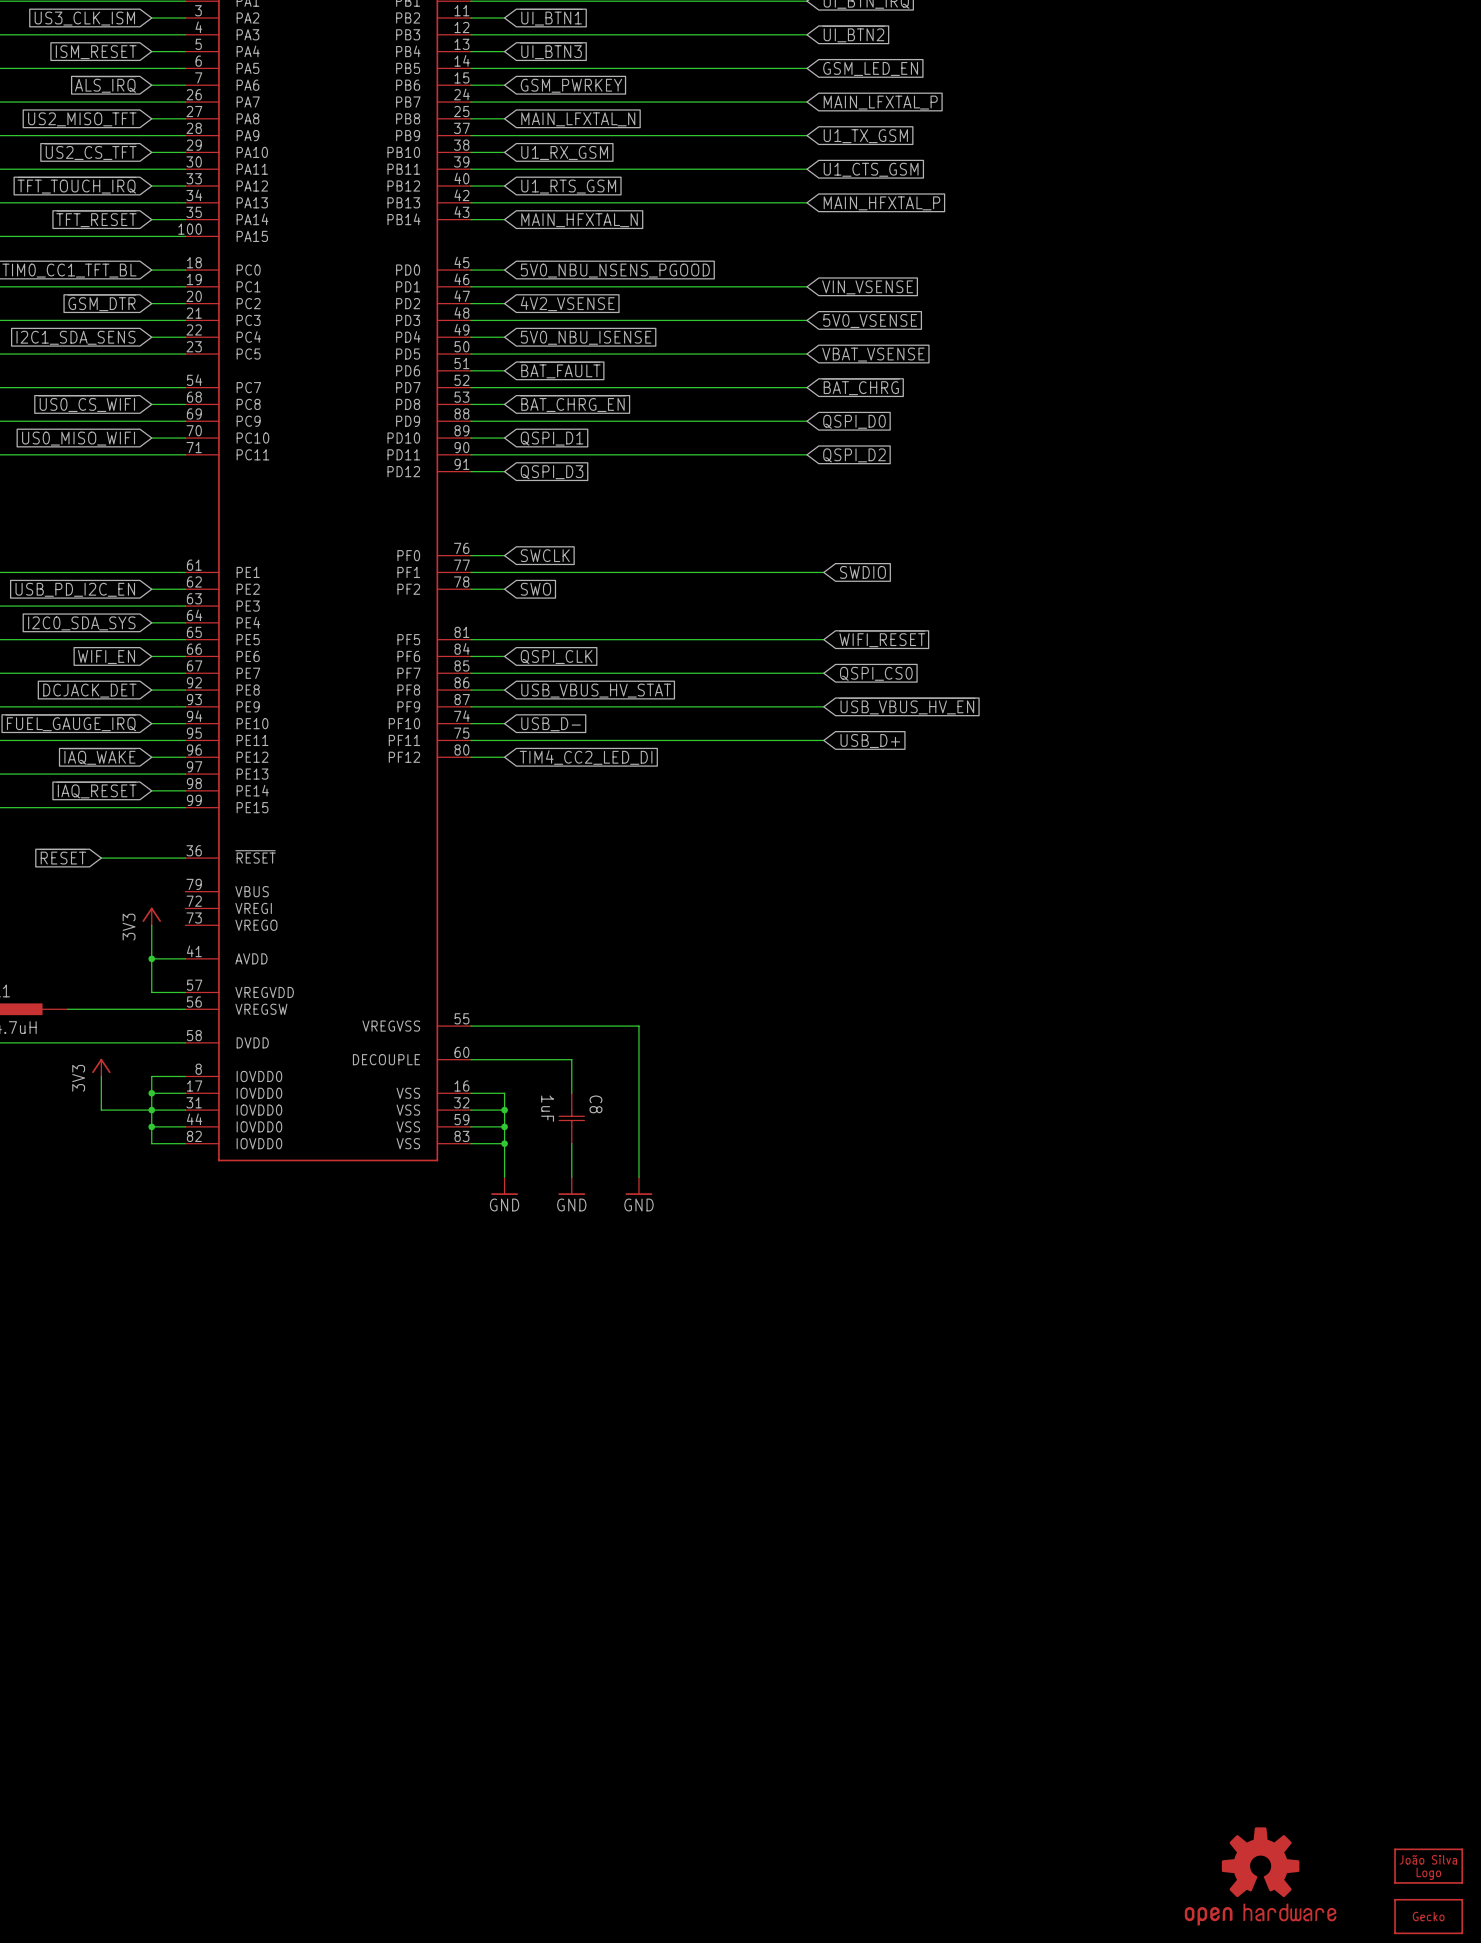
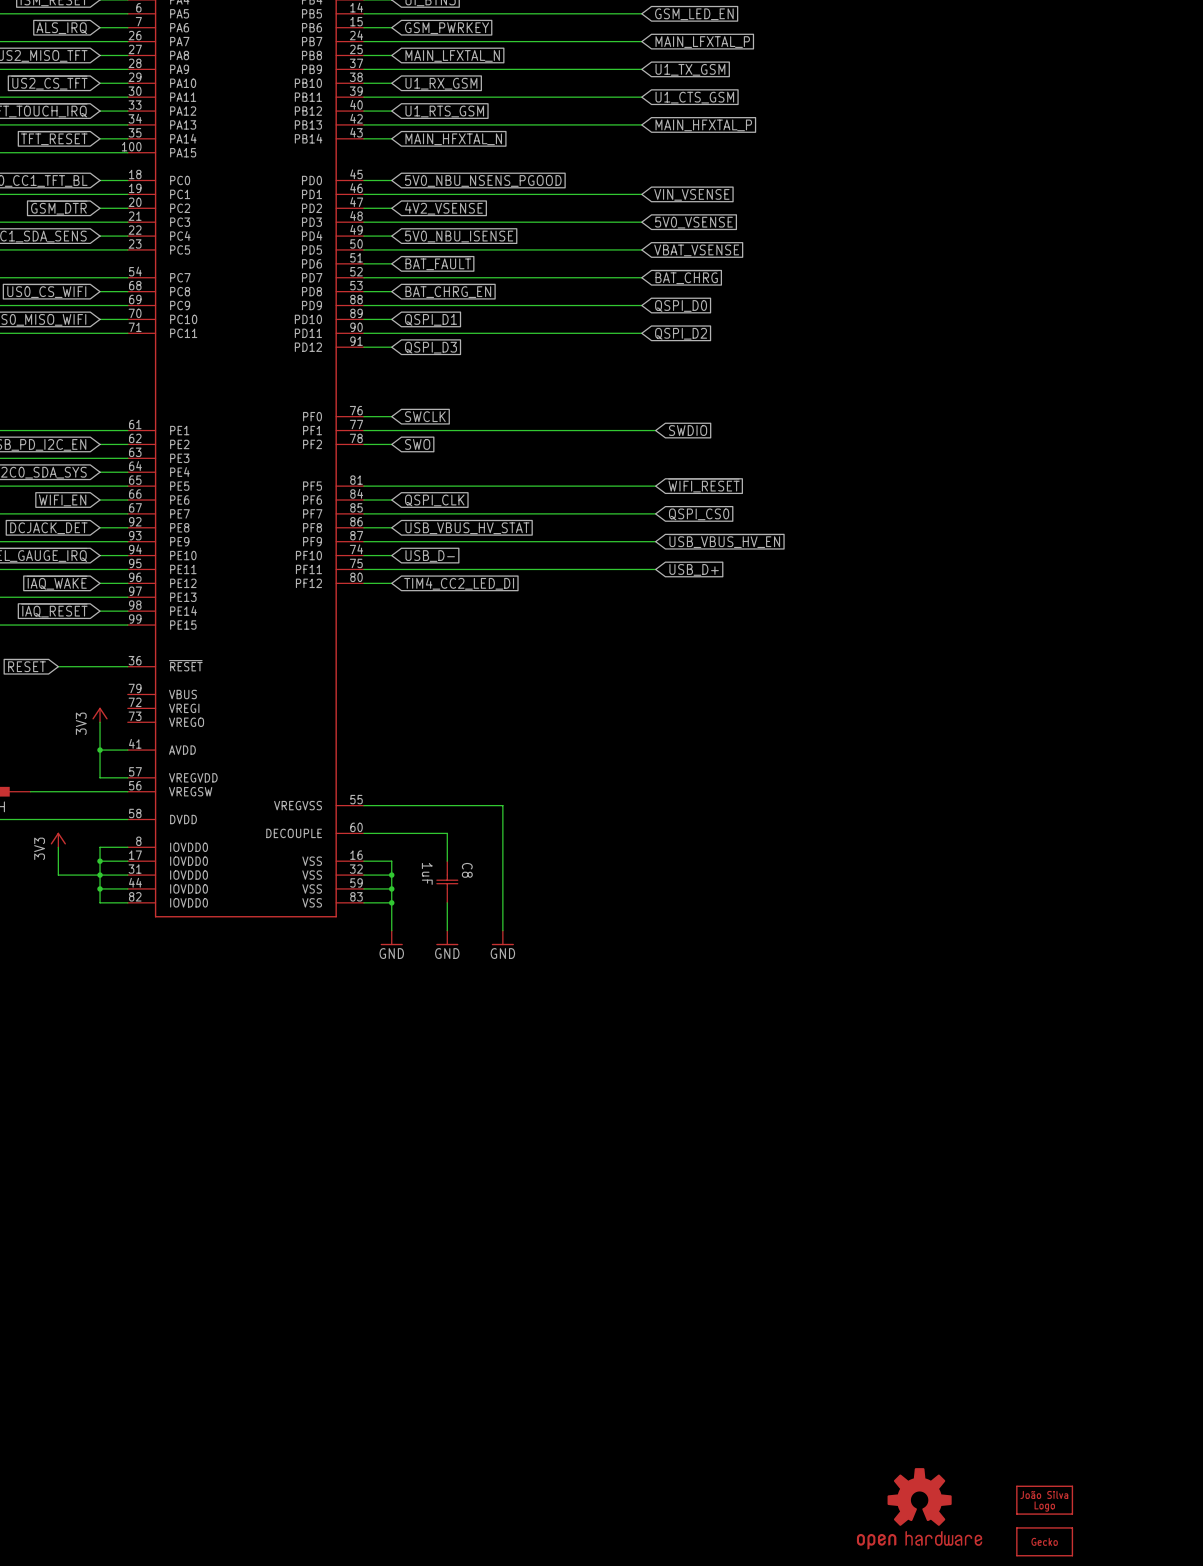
part position: (1428, 1866) -> (1044, 1500)
part position: (1260, 1876) -> (919, 1508)
part position: (1428, 1916) -> (1044, 1541)

